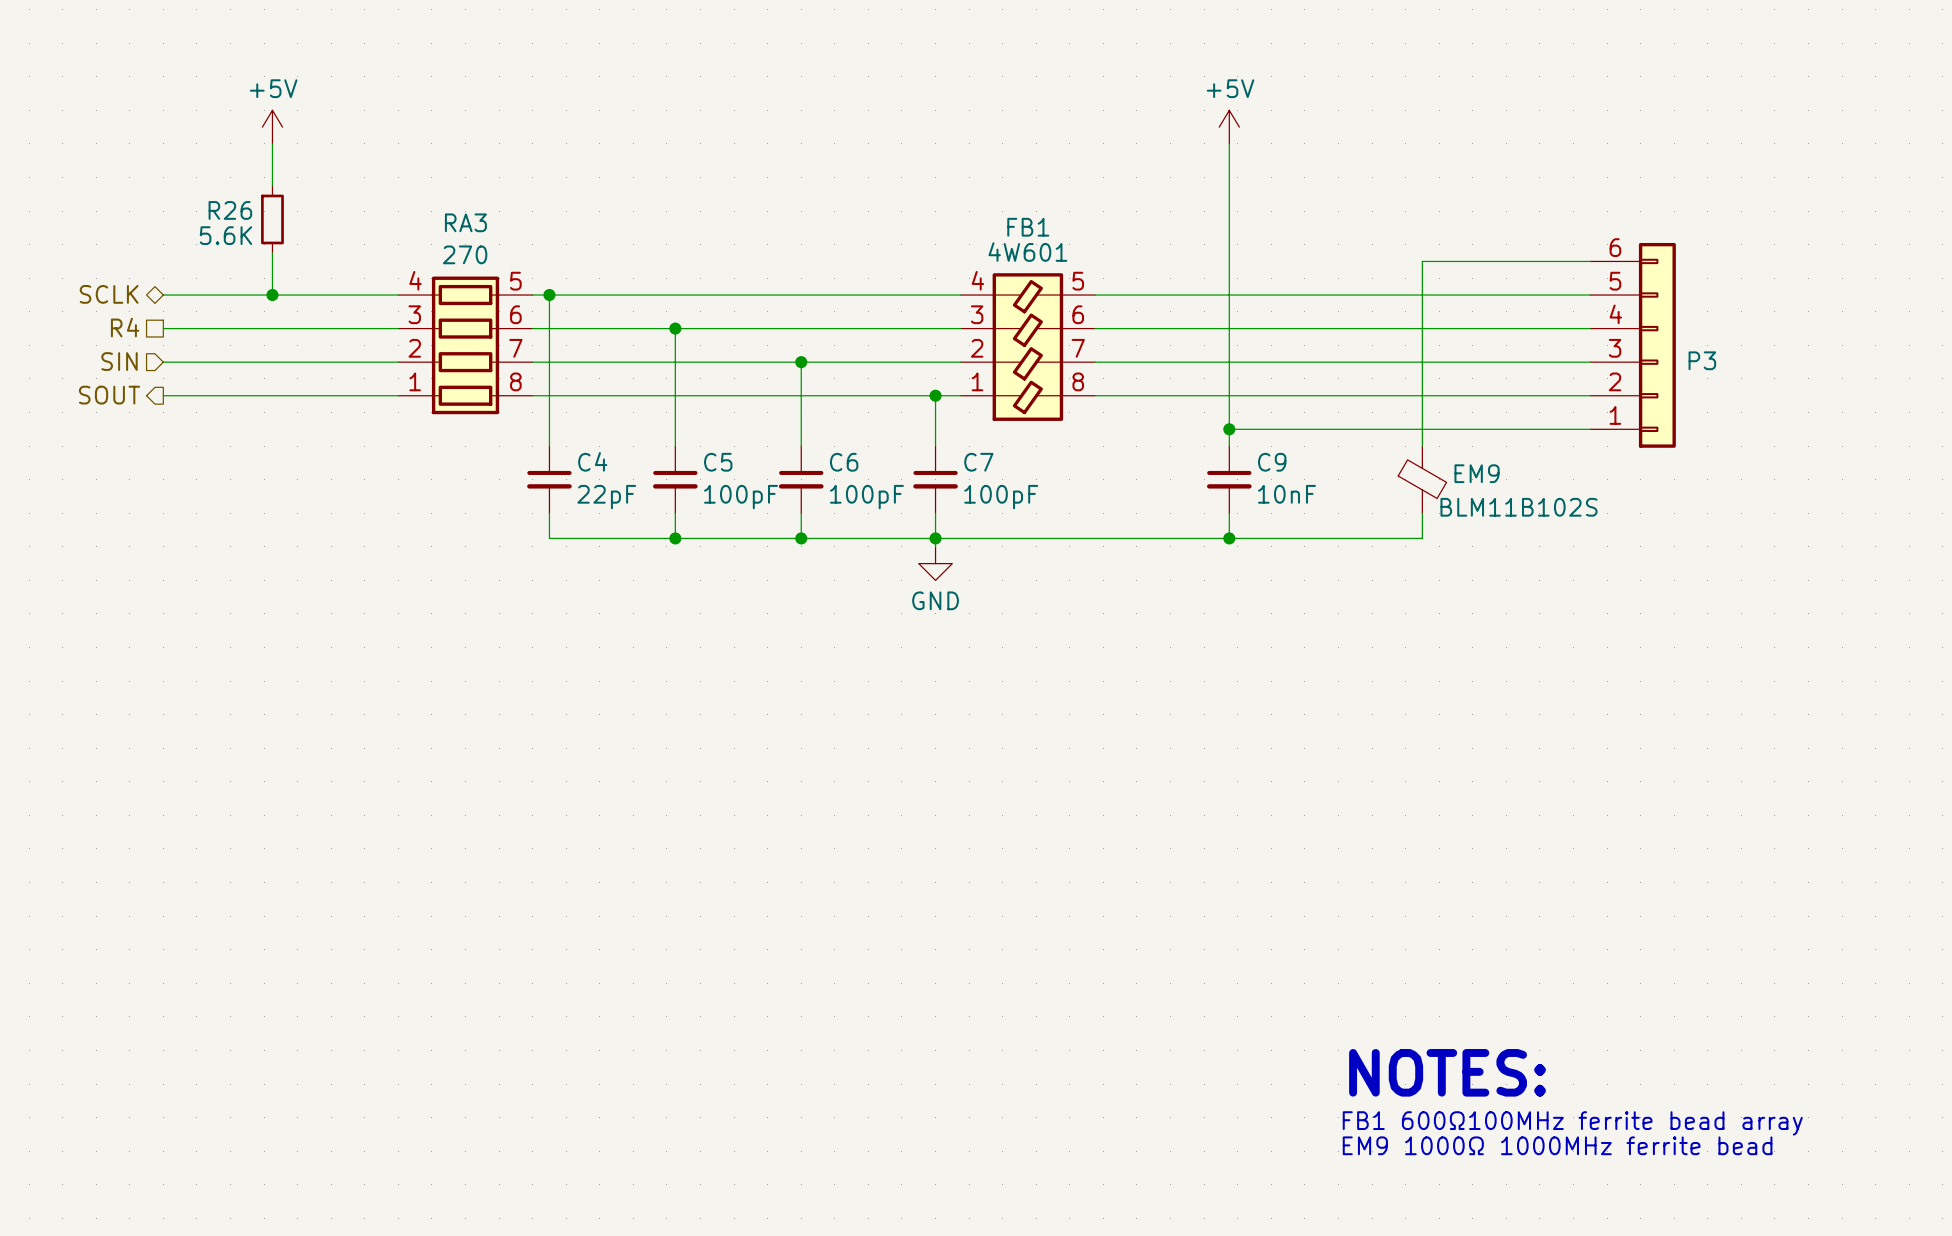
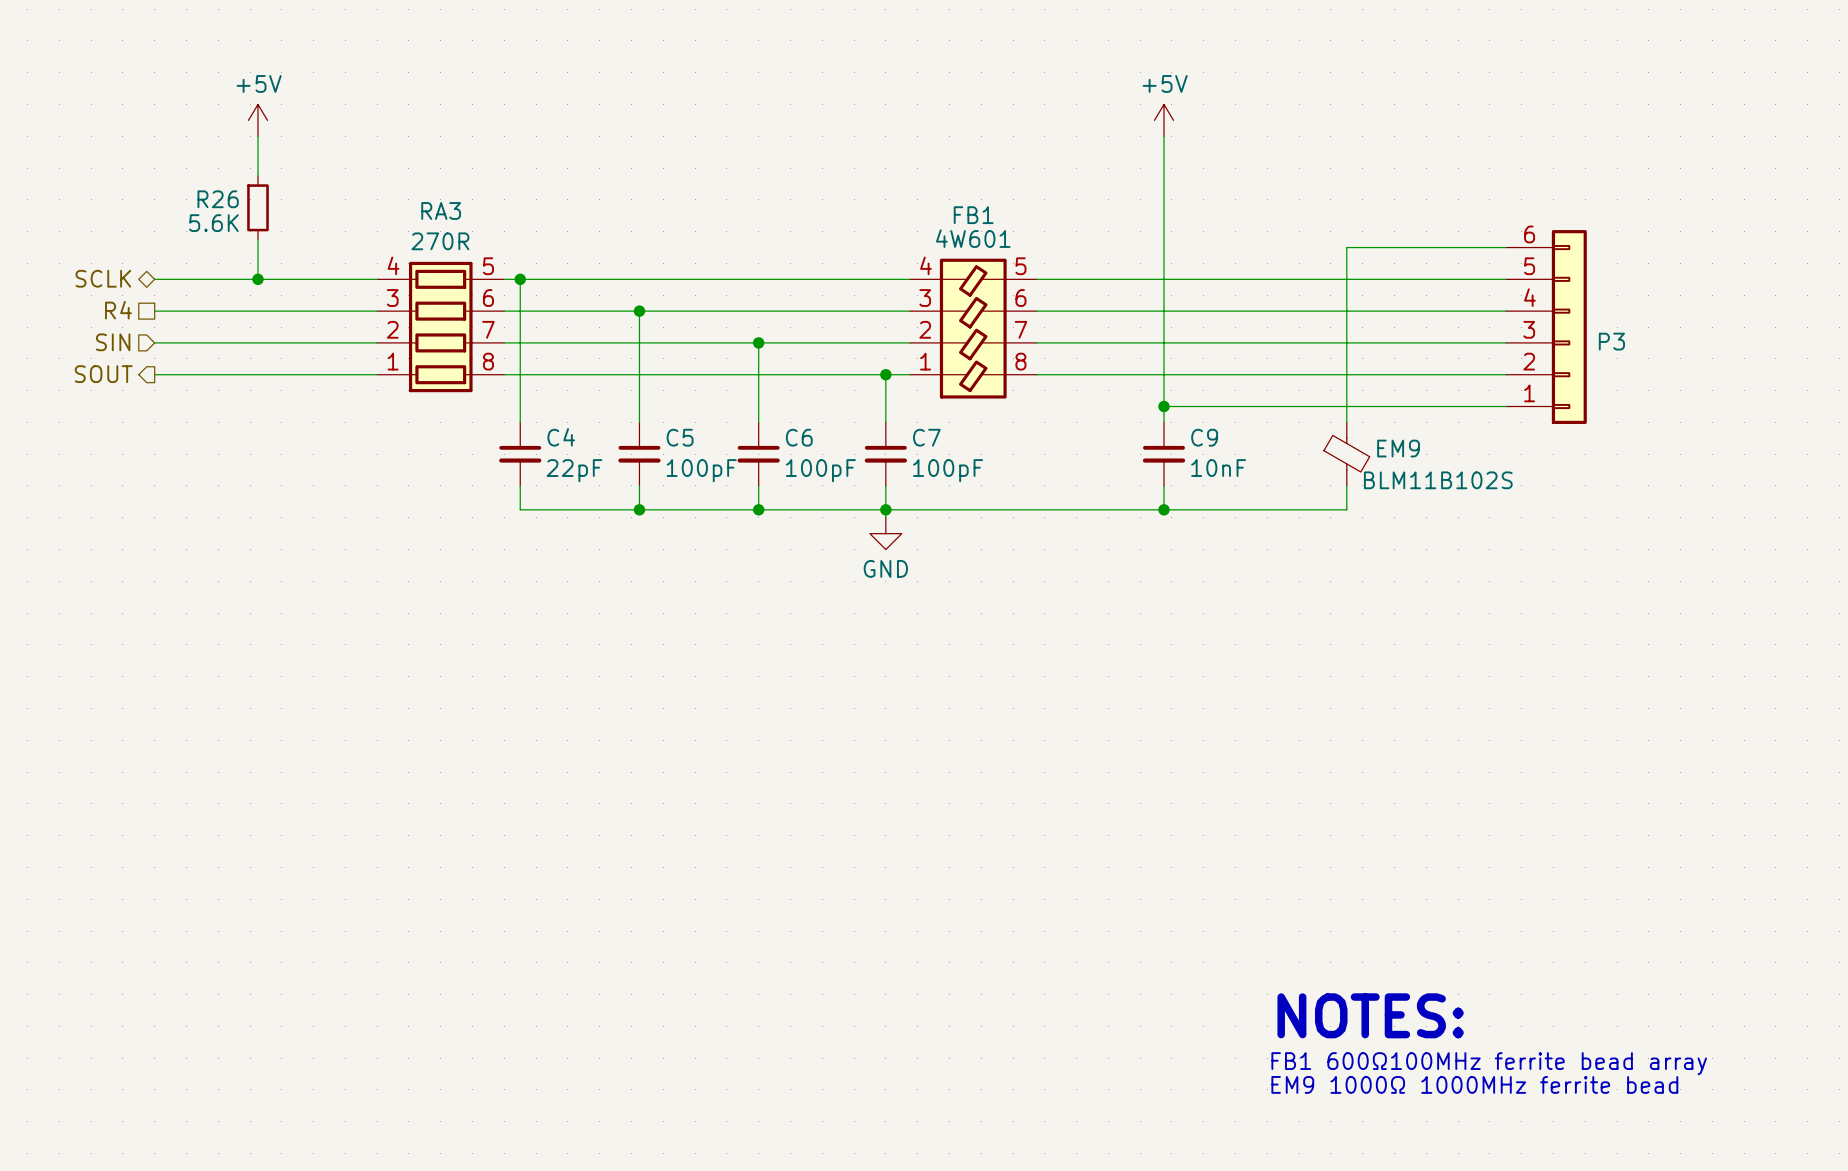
RA3 value: 270 (465, 254) -> 270R (440, 241)

